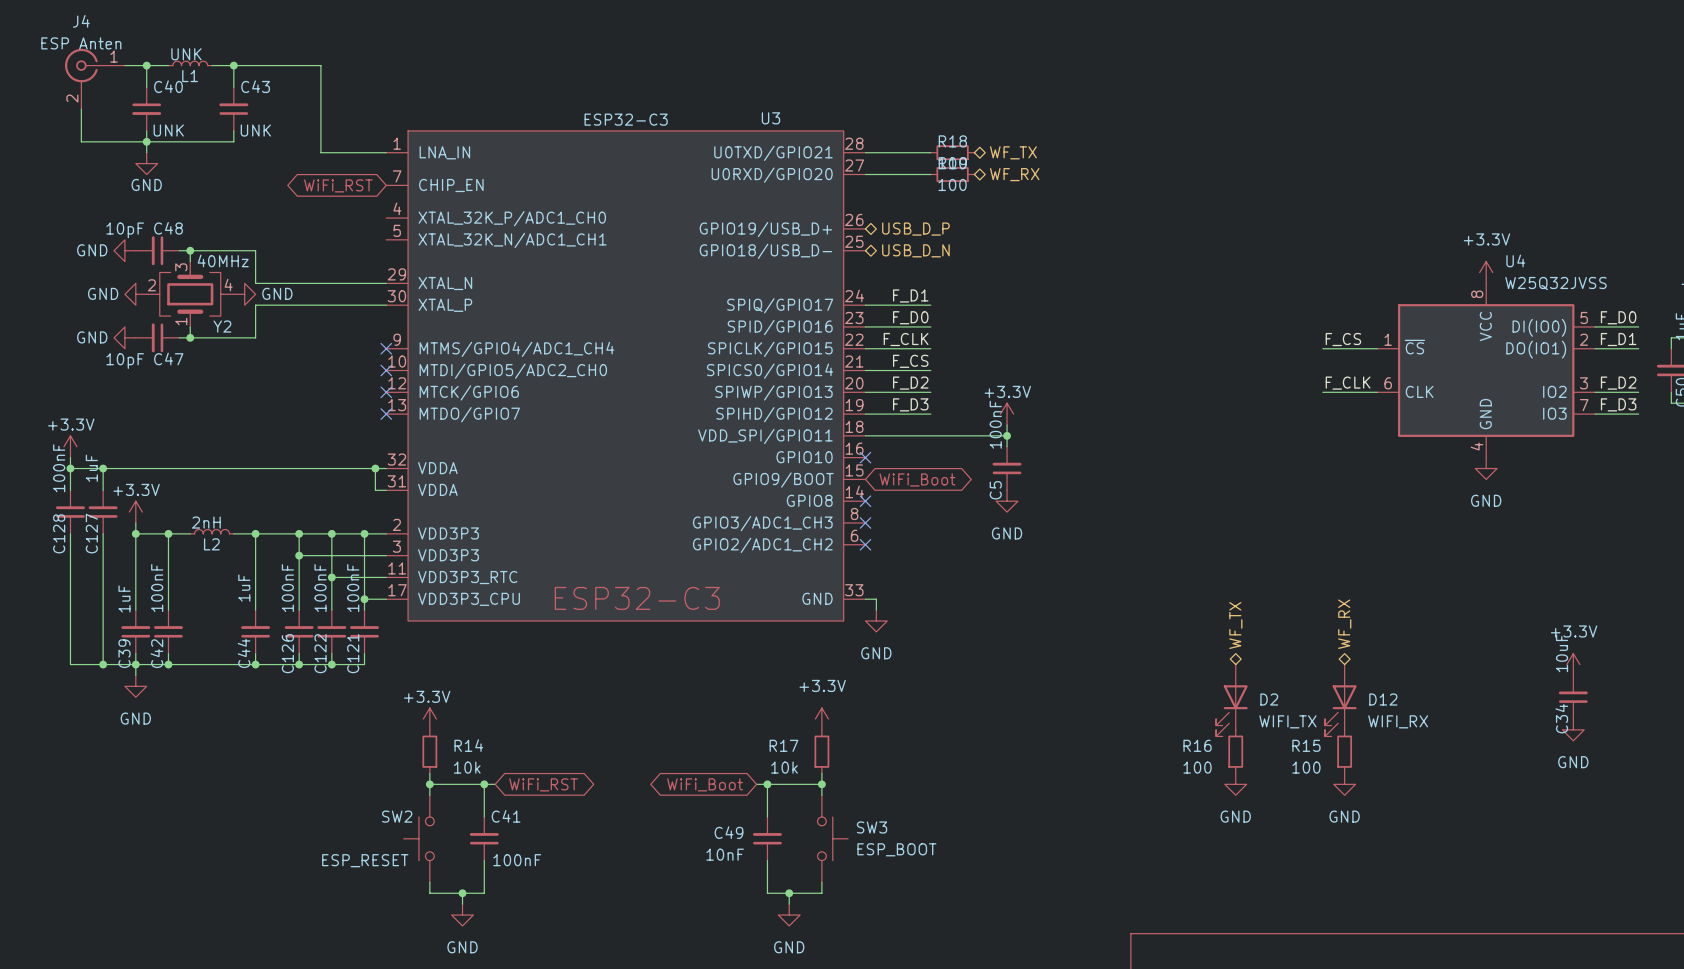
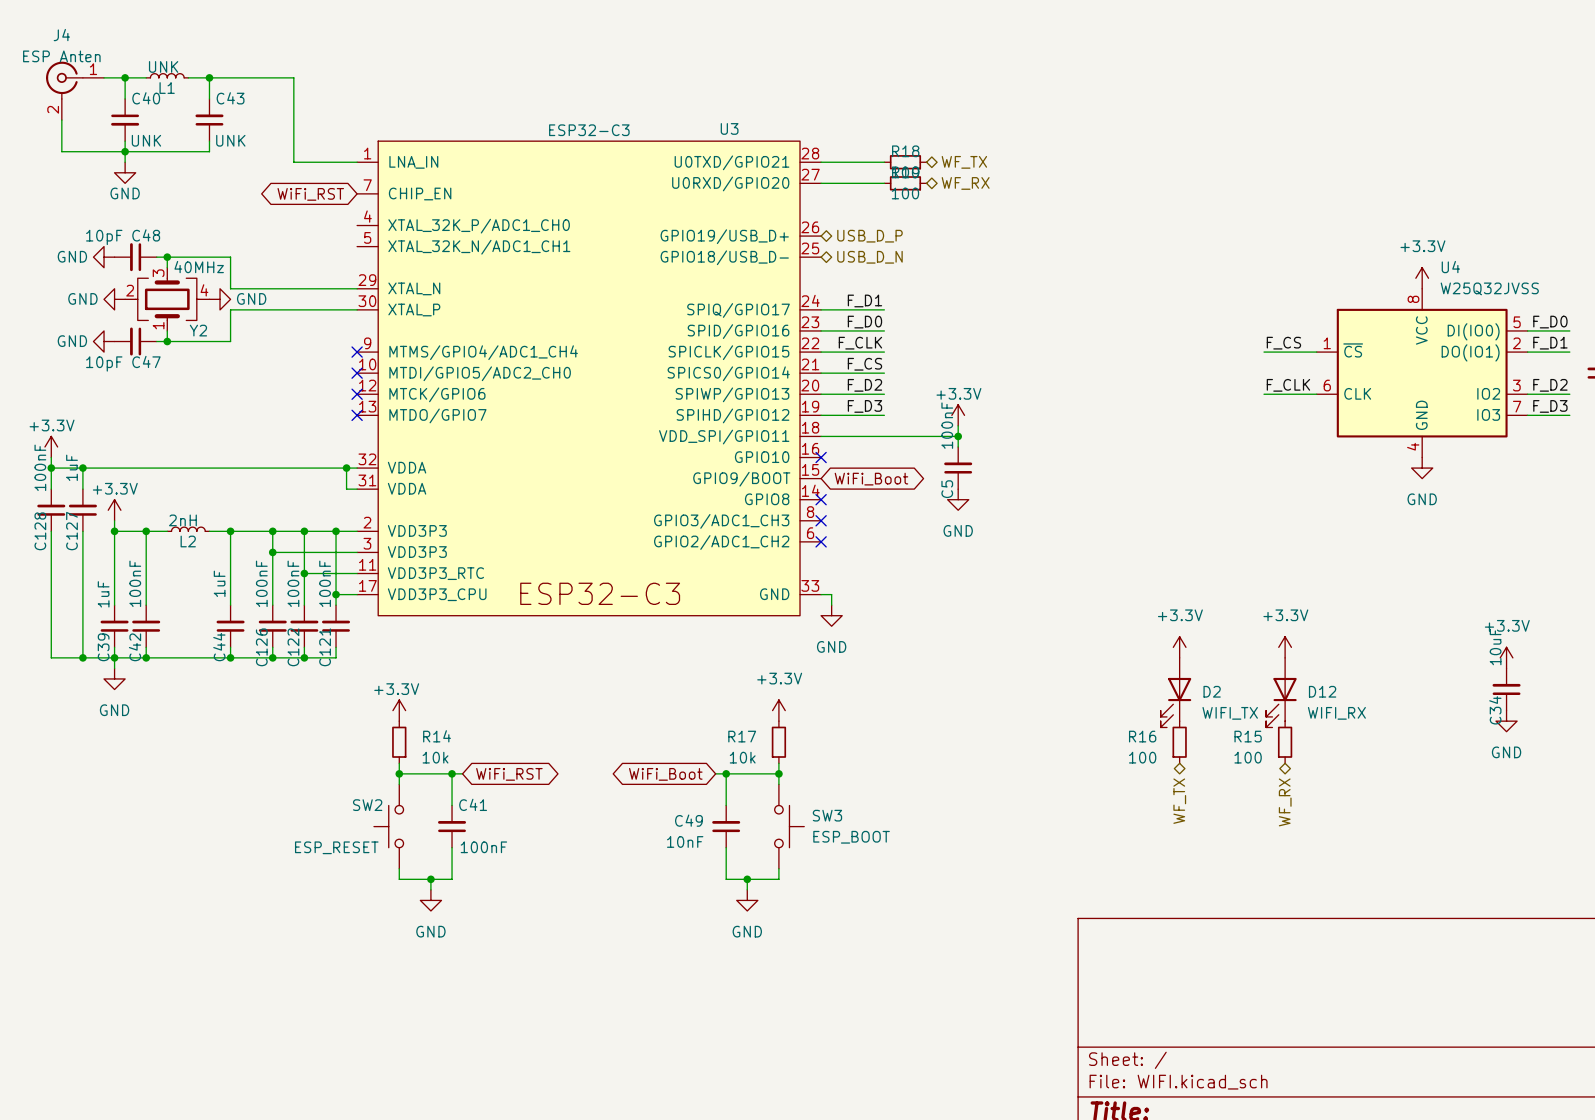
hierarchical label rotation: 0° (1344, 624) -> 180° (1285, 802)
hierarchical label position: WF_RX (1344, 624) -> WF_RX (1285, 802)
hierarchical label rotation: 0° (1235, 625) -> 180° (1179, 801)
hierarchical label position: WF_TX (1235, 625) -> WF_TX (1179, 801)
power symbol: none -> +3.3V (1179, 647)
power symbol: none -> +3.3V (1285, 647)
power symbol: GND (1235, 784) -> none
power symbol: GND (1344, 784) -> none

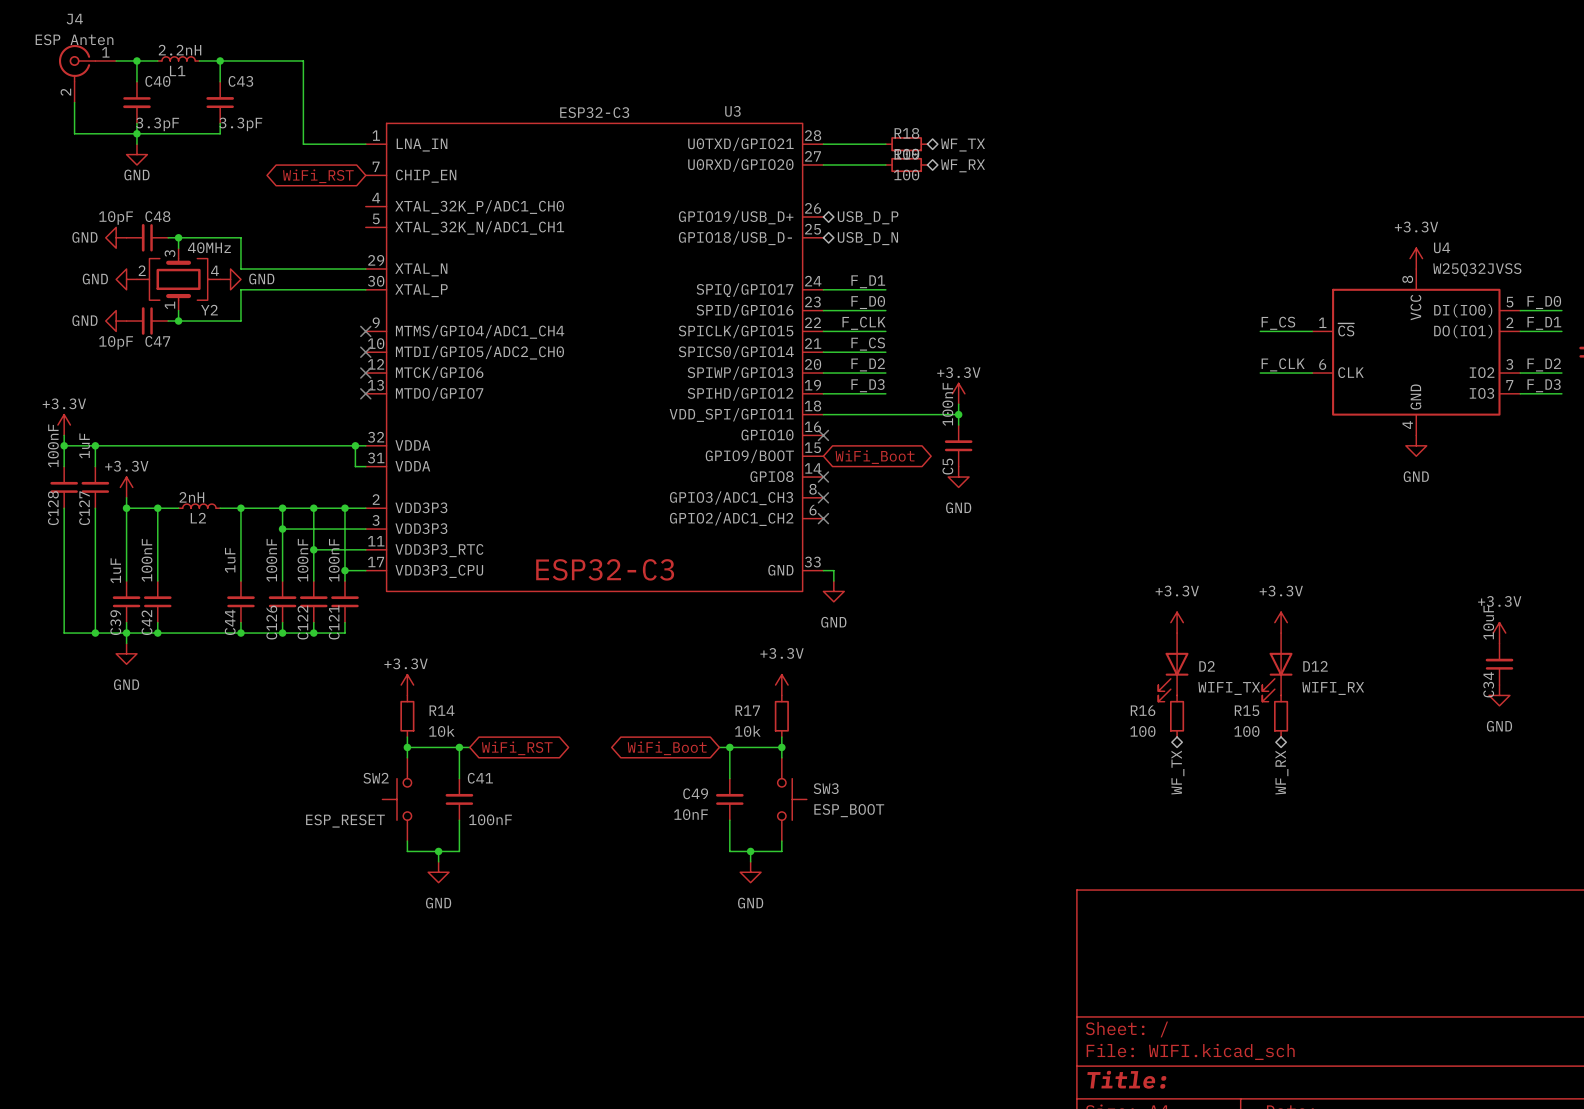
L1 value: UNK (163, 66) -> 2.2nH (180, 50)
C40 value: UNK (146, 140) -> 3.3pF (157, 124)
C43 value: UNK (230, 140) -> 3.3pF (240, 124)

